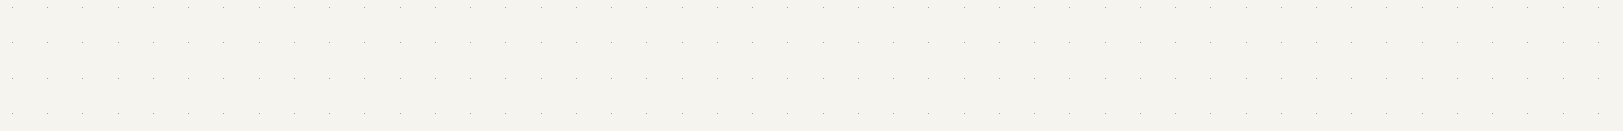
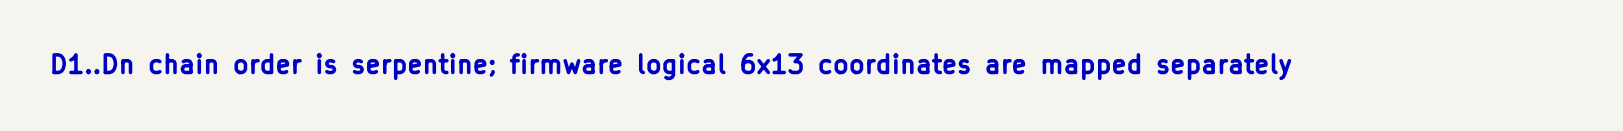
text: none -> D1..Dn chain order is serpentine; firmware logical 6x13 coordinates are mapped separately (671, 66)

